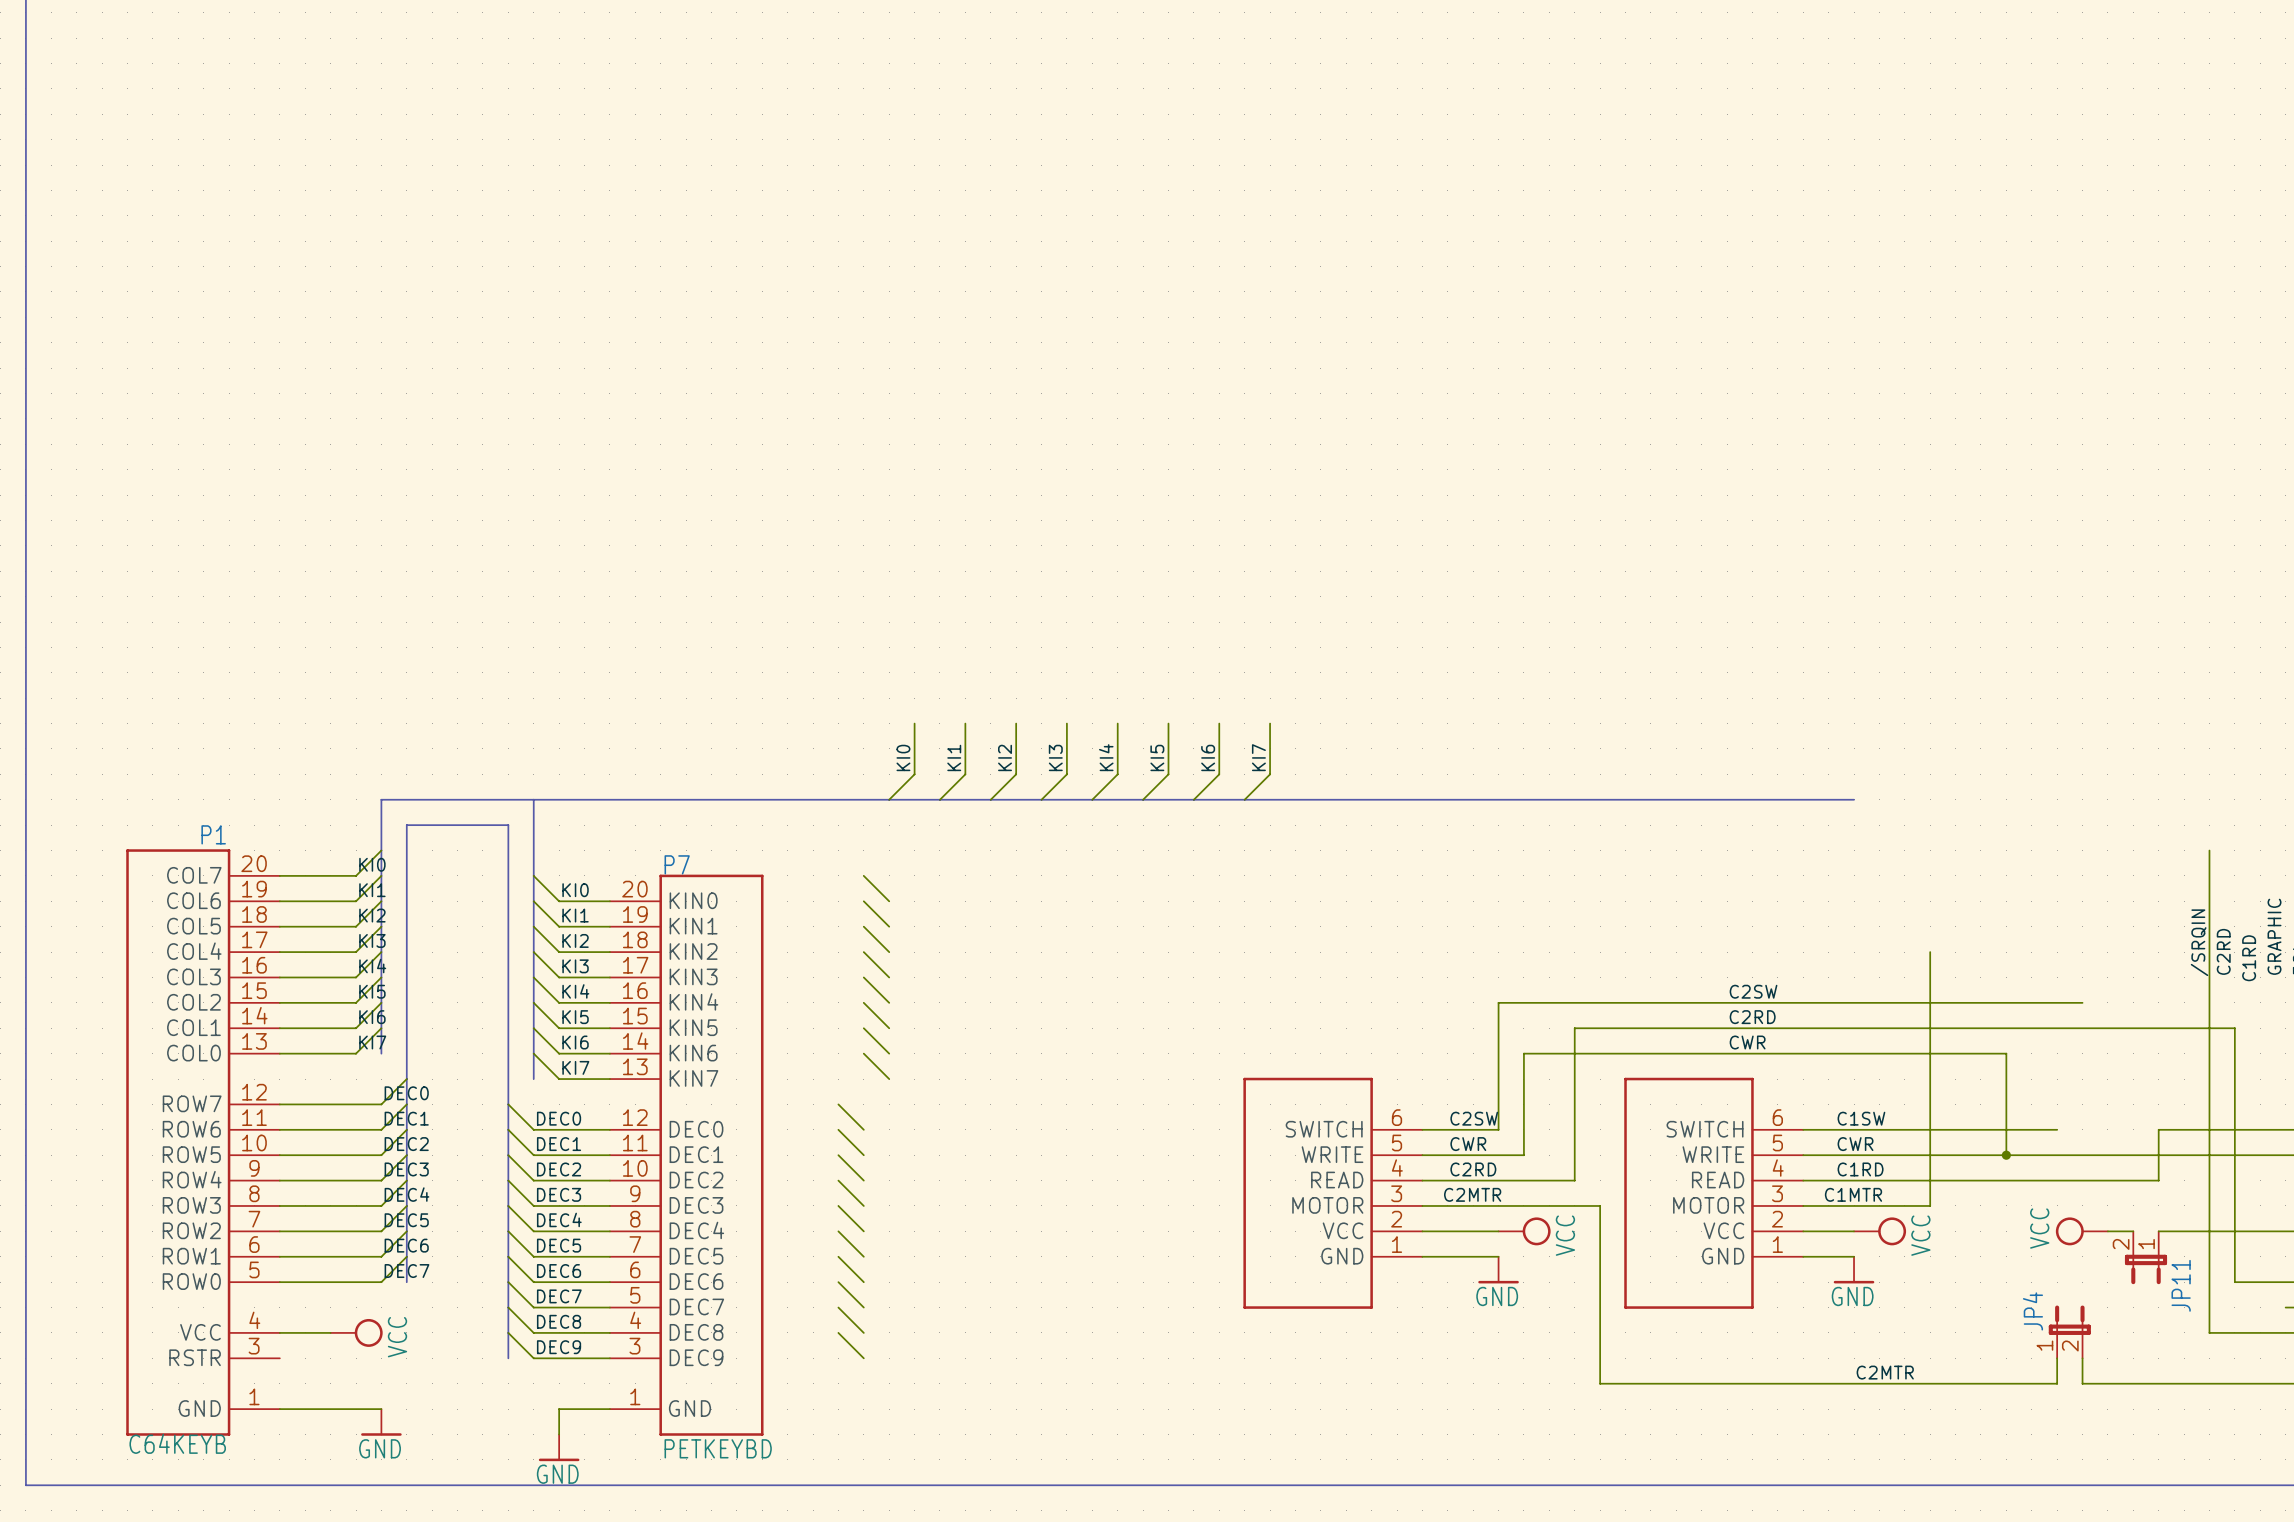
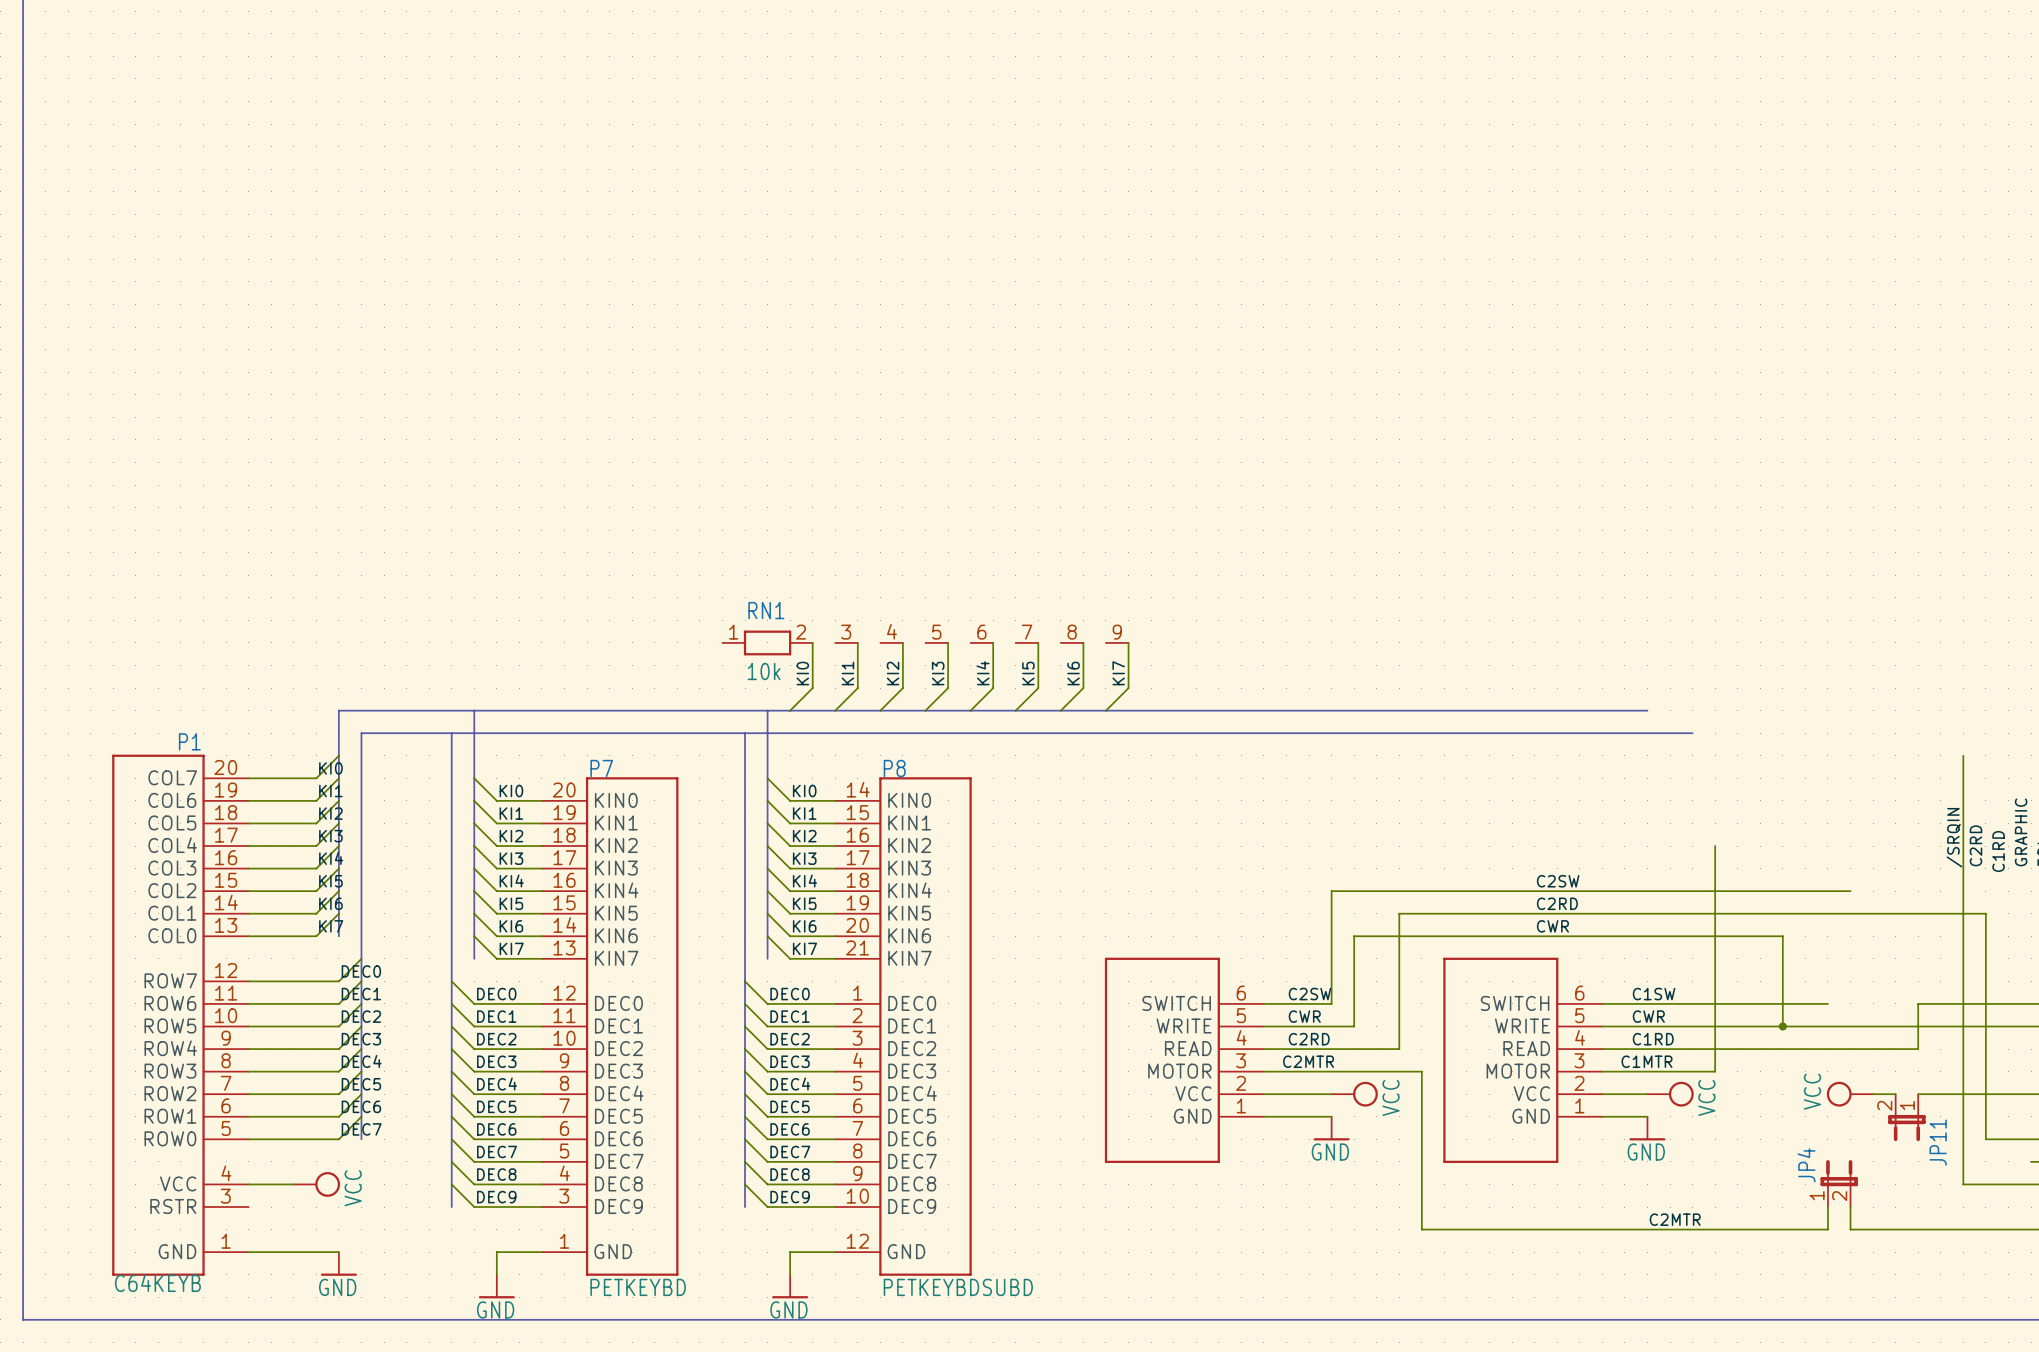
RN1: none -> 10k (925, 642)
bus: none -> (767, 710) (767, 958)
bus: none -> (451, 733) (1692, 733)
bus: none -> (745, 733) (745, 1207)
label: none -> KI0 (804, 791)
wire: none -> (790, 800) (835, 800)
label: none -> KI1 (804, 813)
wire: none -> (790, 823) (835, 823)
label: none -> KI2 (804, 836)
wire: none -> (790, 846) (835, 846)
label: none -> KI3 (804, 858)
wire: none -> (790, 868) (835, 868)
label: none -> KI4 (804, 880)
wire: none -> (790, 891) (835, 891)
label: none -> KI5 (804, 903)
wire: none -> (790, 913) (835, 913)
label: none -> KI6 (804, 926)
wire: none -> (790, 936) (835, 936)
label: none -> KI7 (804, 948)
wire: none -> (790, 958) (835, 958)
label: none -> DEC0 (790, 994)
wire: none -> (767, 1003) (835, 1003)
label: none -> DEC1 (790, 1016)
wire: none -> (767, 1026) (835, 1026)
P8: none -> PETKEYBDSUBD (903, 1026)
label: none -> DEC2 (790, 1039)
wire: none -> (767, 1049) (835, 1049)
label: none -> DEC3 (790, 1061)
wire: none -> (767, 1071) (835, 1071)
label: none -> DEC4 (790, 1084)
wire: none -> (767, 1094) (835, 1094)
label: none -> DEC5 (790, 1106)
wire: none -> (767, 1116) (835, 1116)
label: none -> DEC6 (790, 1129)
wire: none -> (767, 1139) (835, 1139)
label: none -> DEC7 (790, 1151)
wire: none -> (767, 1161) (835, 1161)
label: none -> DEC8 (790, 1174)
wire: none -> (767, 1184) (835, 1184)
label: none -> DEC9 (790, 1197)
wire: none -> (767, 1207) (835, 1207)
wire: none -> (835, 1252) (790, 1252) (790, 1274)
power symbol: none -> GND (790, 1286)

